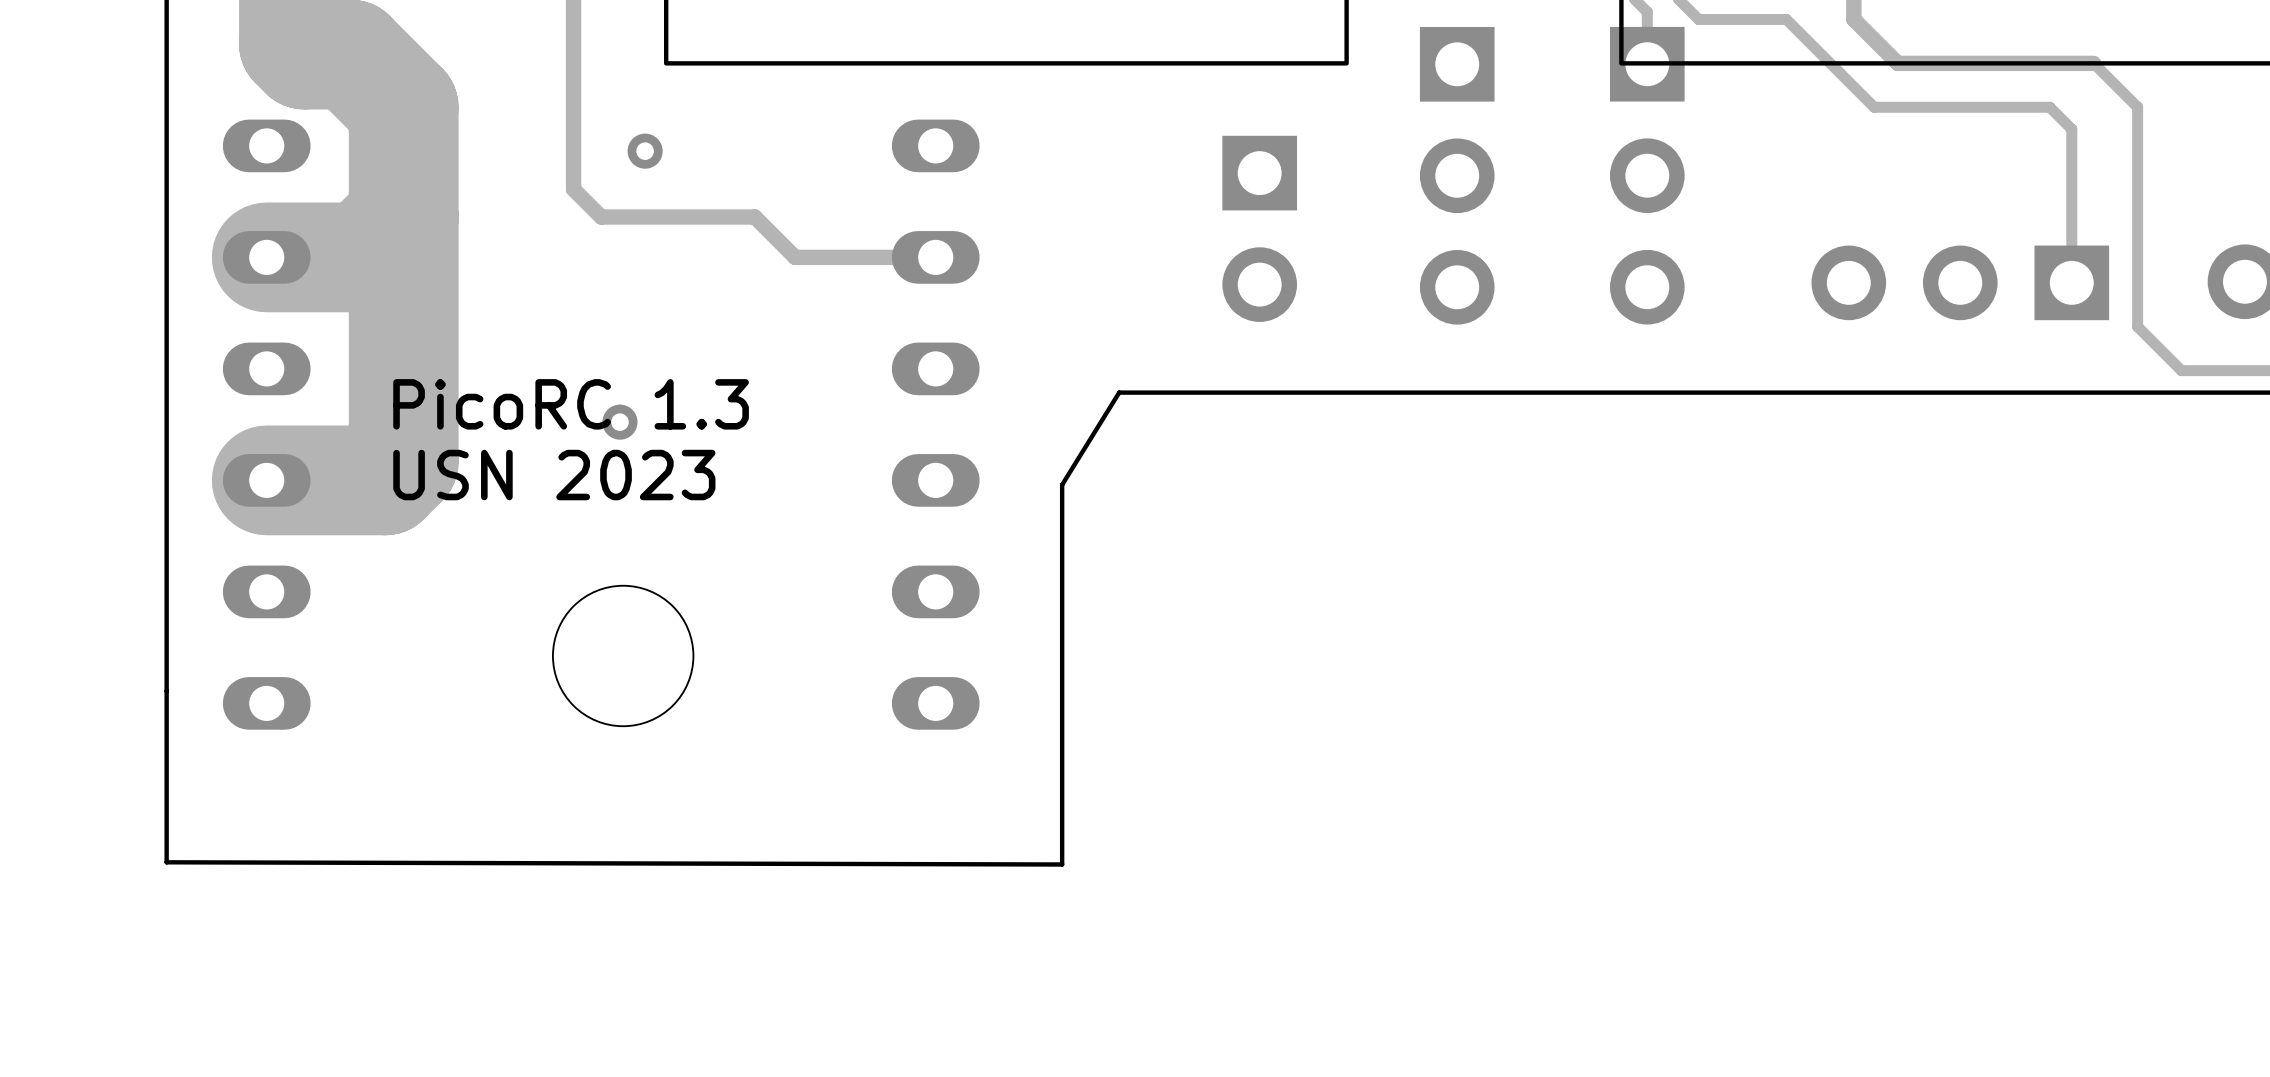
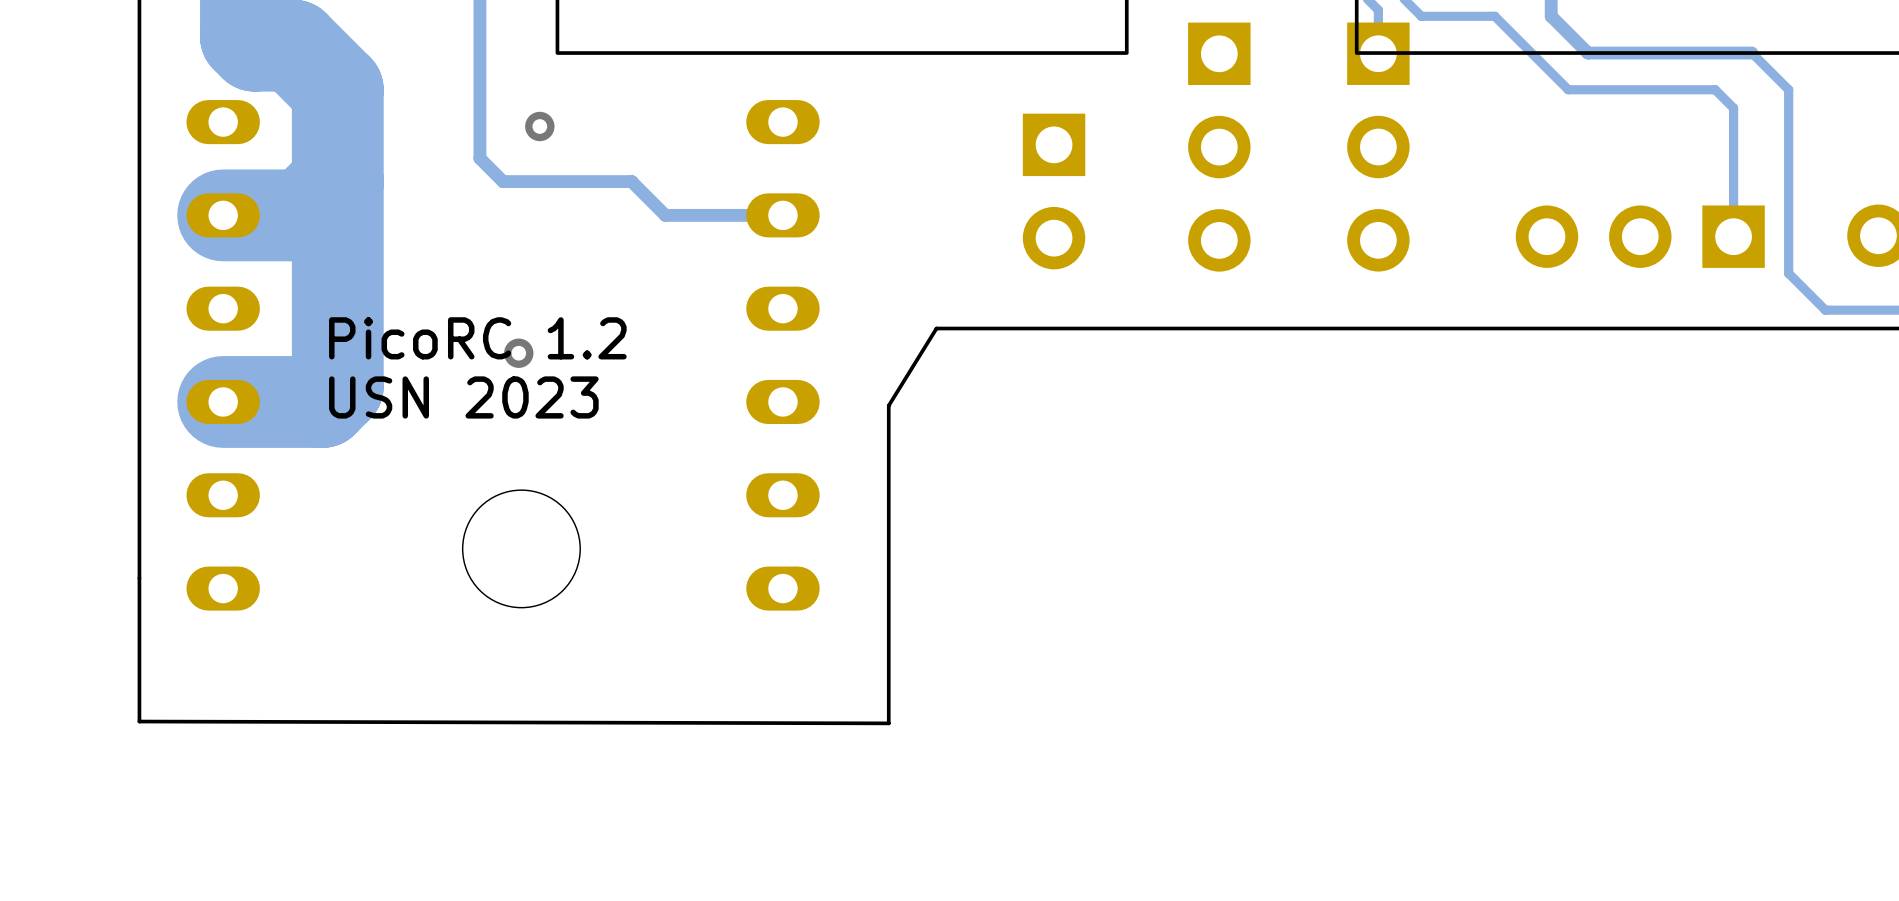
text: PicoRC 1.3 (571, 404) -> PicoRC 1.2 (477, 338)

